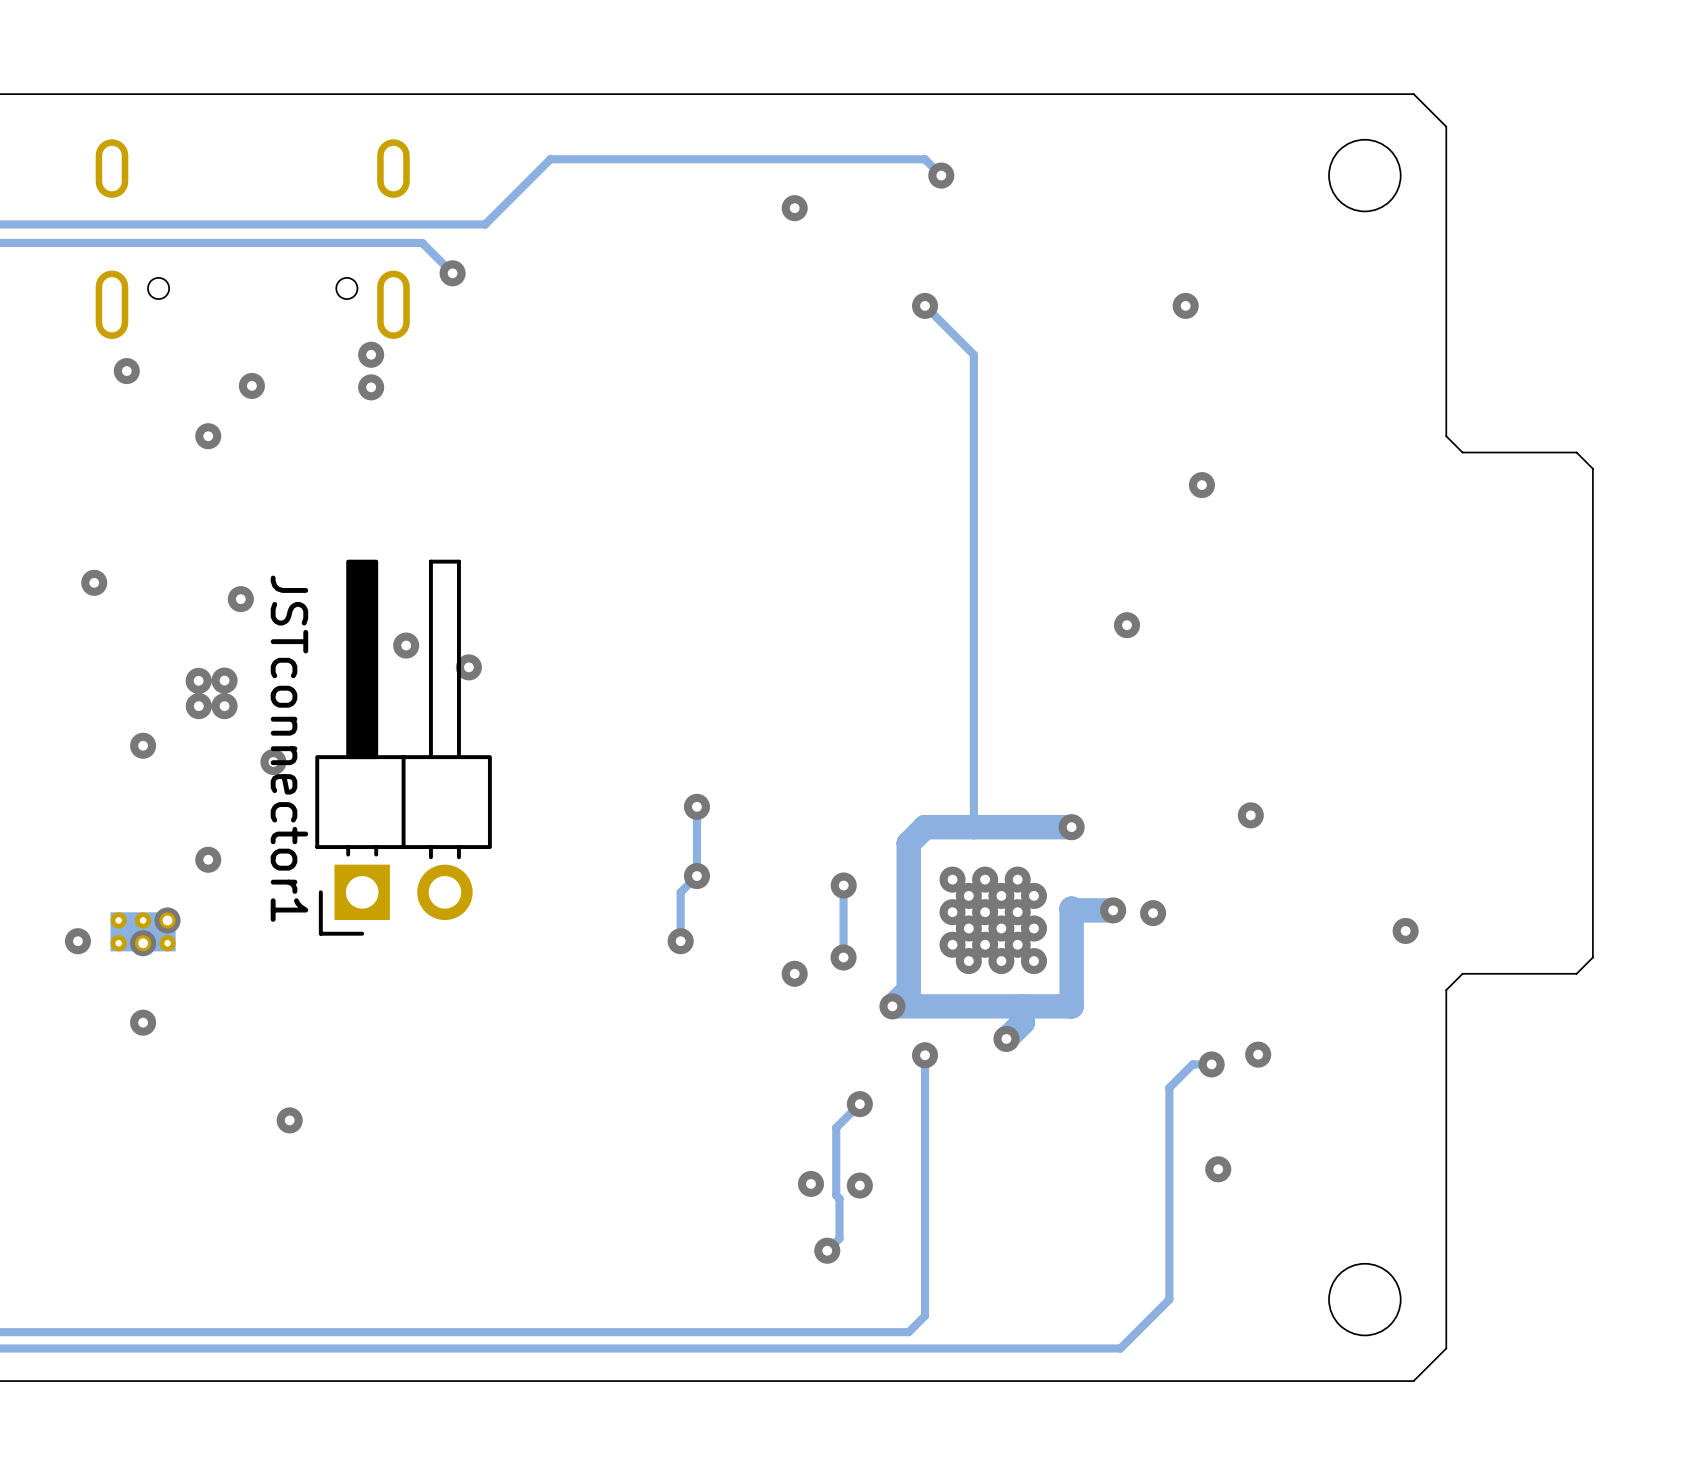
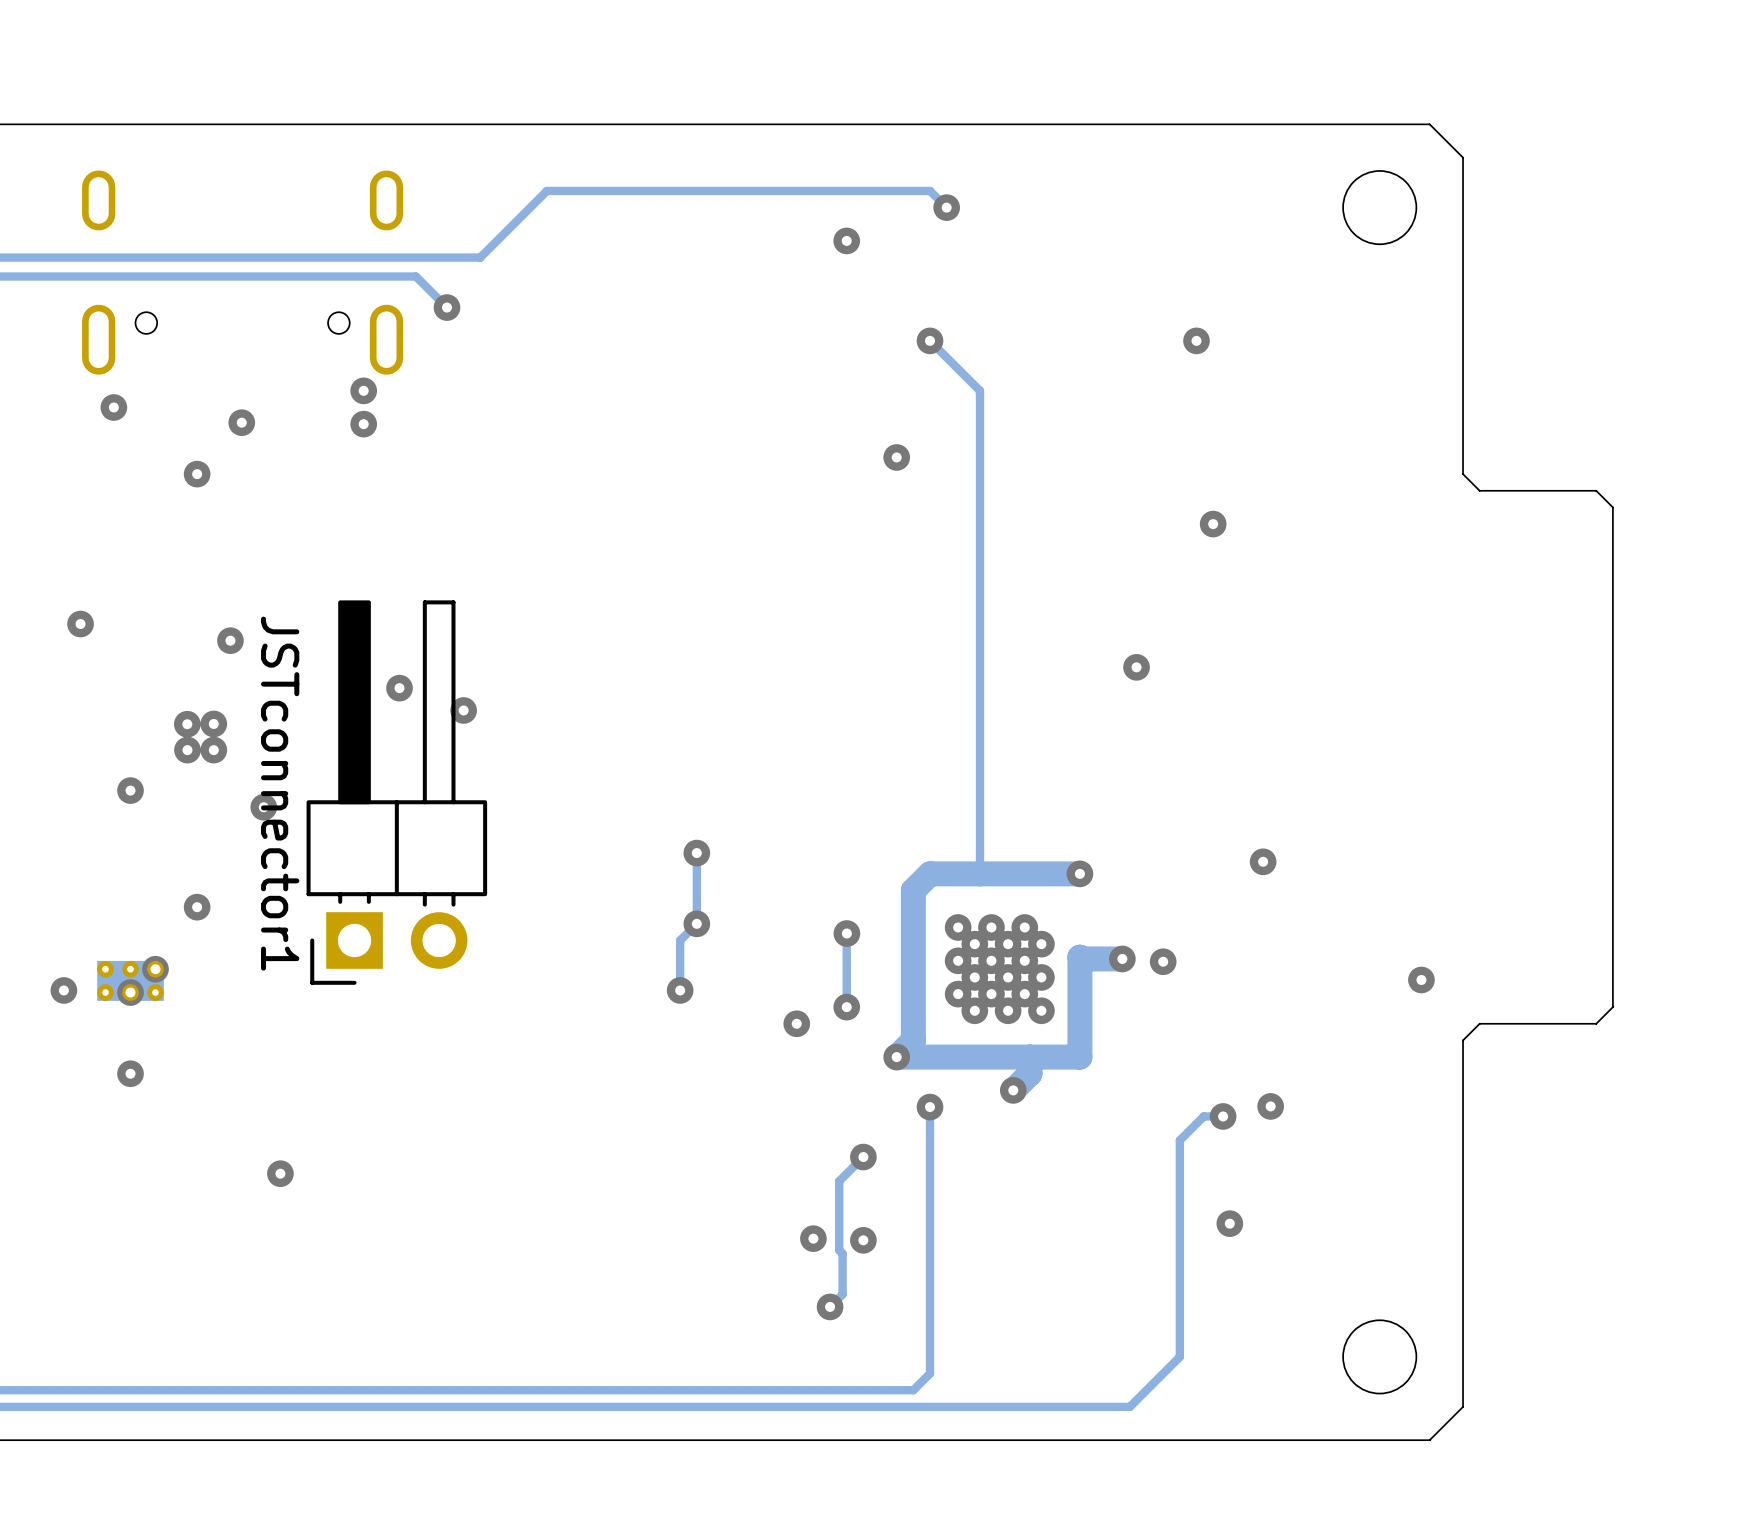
via position: (794, 208) -> (846, 240)
via: none -> (896, 457)

